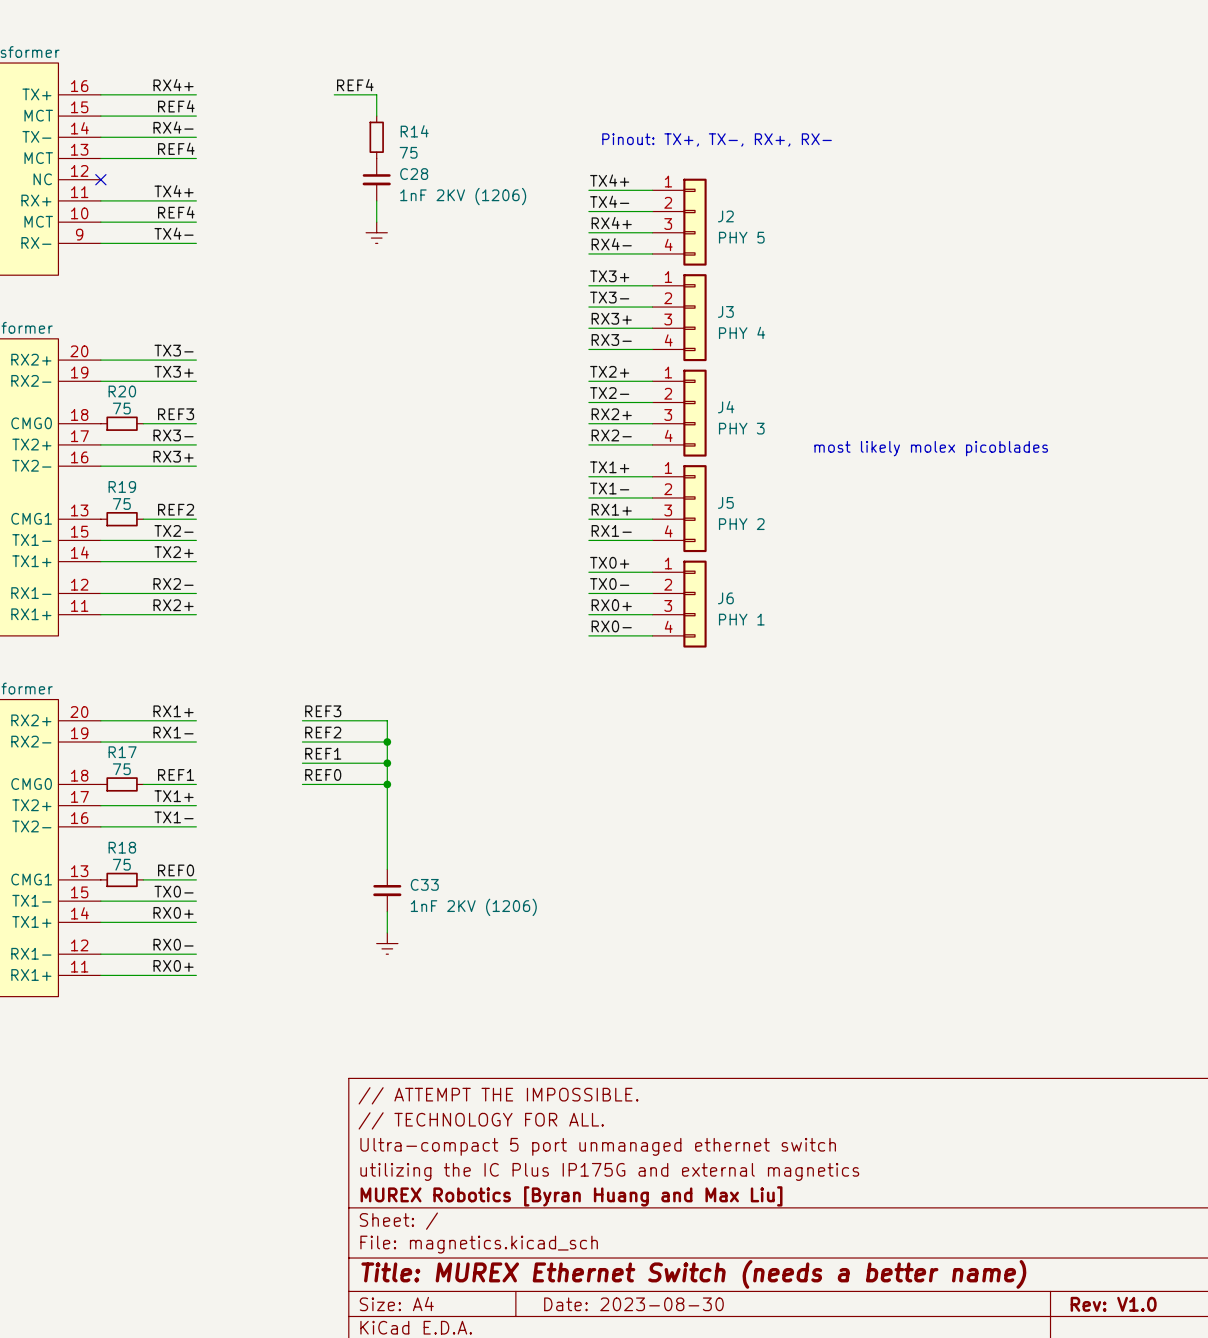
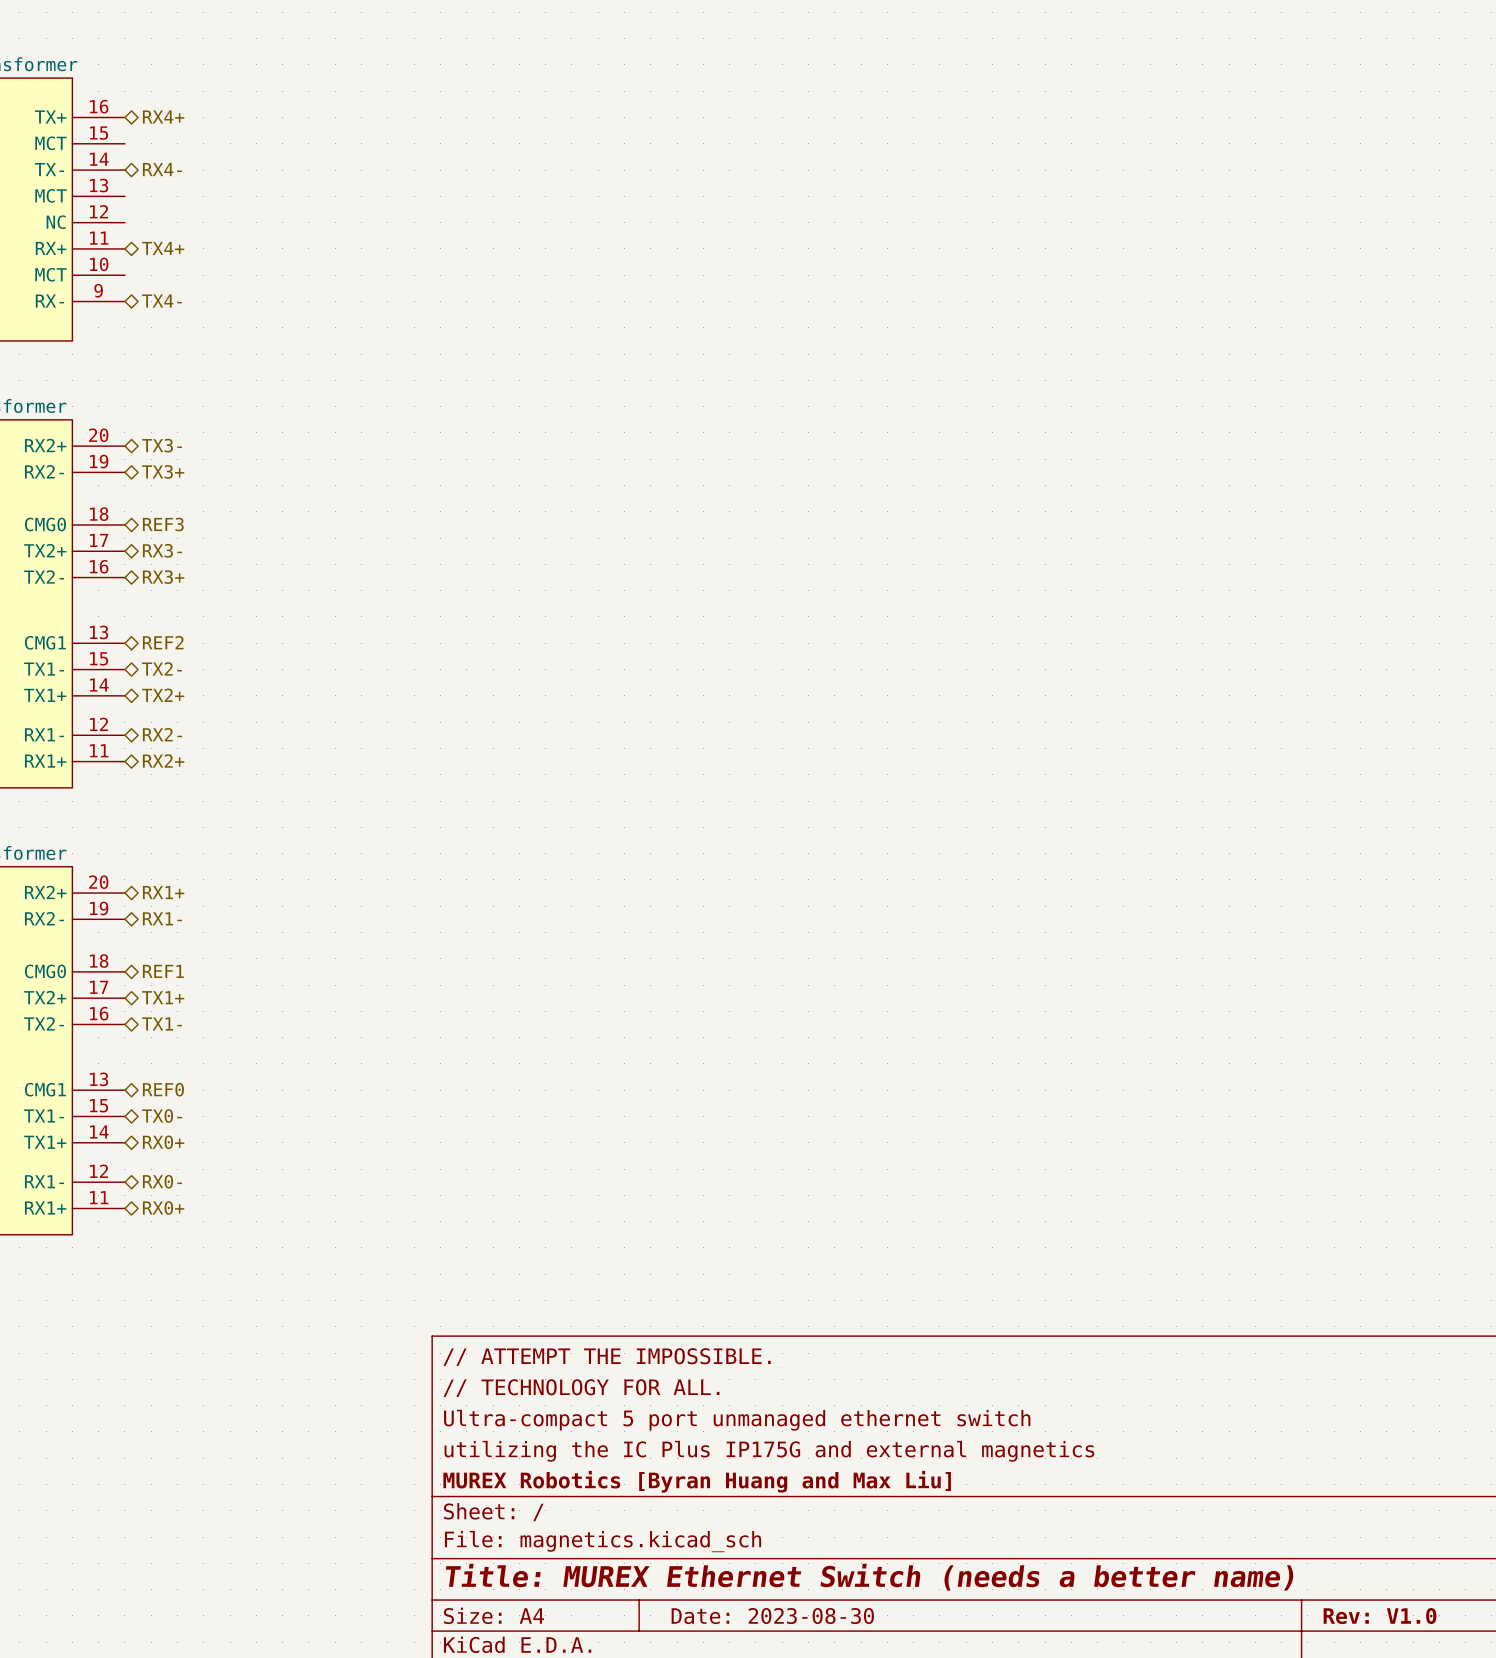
label: RX4+ (173, 85) -> none
label: REF4 (355, 85) -> none
wire: (100, 94) (196, 94) -> none
hierarchical label: none -> RX4+ (163, 117)
wire: (334, 94) (376, 94) (376, 116) -> none
label: REF4 (176, 106) -> none
wire: (100, 116) (196, 116) -> none
label: RX4- (173, 127) -> none
hierarchical label: none -> RX4- (162, 169)
wire: (100, 137) (196, 137) -> none
R14: 75 (376, 137) -> none
text: Pinout: TX+, TX-, RX+, RX- (717, 139) -> none
label: REF4 (176, 148) -> none
wire: (100, 158) (196, 158) -> none
no-connect mark: (100, 179) -> none
C28: 1nF 2KV (1206) (376, 179) -> none
label: TX4+ (609, 180) -> none
wire: (588, 190) (652, 190) -> none
label: TX4+ (174, 191) -> none
wire: (100, 200) (196, 200) -> none
hierarchical label: none -> TX4+ (163, 248)
wire: (376, 200) (376, 222) -> none
label: TX4- (609, 201) -> none
wire: (588, 211) (652, 211) -> none
label: REF4 (176, 212) -> none
wire: (100, 222) (196, 222) -> none
J2: PHY 5 (679, 222) -> none
label: RX4+ (611, 223) -> none
power symbol: (376, 232) -> none
wire: (588, 232) (652, 232) -> none
label: TX4- (174, 233) -> none
hierarchical label: none -> TX4- (162, 301)
wire: (100, 243) (196, 243) -> none
label: RX4- (611, 244) -> none
wire: (588, 253) (652, 253) -> none
label: TX3+ (609, 276) -> none
wire: (588, 285) (652, 285) -> none
label: TX3- (609, 297) -> none
wire: (588, 307) (652, 307) -> none
J3: PHY 4 (679, 317) -> none
label: RX3+ (611, 318) -> none
wire: (588, 328) (652, 328) -> none
label: RX3- (611, 339) -> none
wire: (588, 349) (652, 349) -> none
label: TX3- (174, 350) -> none
hierarchical label: none -> TX3- (162, 445)
wire: (100, 360) (196, 360) -> none
label: TX3+ (174, 371) -> none
label: TX2+ (609, 371) -> none
hierarchical label: none -> TX3+ (163, 471)
wire: (100, 381) (196, 381) -> none
wire: (588, 381) (652, 381) -> none
label: TX2- (609, 393) -> none
wire: (588, 402) (652, 402) -> none
J4: PHY 3 (679, 413) -> none
label: REF3 (176, 414) -> none
label: RX2+ (611, 414) -> none
R20: 75 (122, 423) -> none
hierarchical label: none -> REF3 (163, 524)
wire: (143, 423) (196, 423) -> none
wire: (588, 423) (652, 423) -> none
label: RX3- (173, 435) -> none
label: RX2- (611, 435) -> none
wire: (100, 444) (196, 444) -> none
hierarchical label: none -> RX3- (162, 550)
wire: (588, 444) (652, 444) -> none
text: most likely molex picoblades (931, 448) -> none
label: RX3+ (173, 456) -> none
hierarchical label: none -> RX3+ (163, 577)
wire: (100, 466) (196, 466) -> none
label: TX1+ (609, 467) -> none
wire: (588, 476) (652, 476) -> none
label: TX1- (609, 488) -> none
wire: (588, 497) (652, 497) -> none
J5: PHY 2 (679, 508) -> none
label: REF2 (176, 509) -> none
label: RX1+ (611, 509) -> none
hierarchical label: none -> REF2 (163, 642)
R19: 75 (122, 519) -> none
wire: (143, 519) (196, 519) -> none
wire: (588, 519) (652, 519) -> none
label: TX2- (174, 530) -> none
label: RX1- (611, 530) -> none
wire: (100, 540) (196, 540) -> none
hierarchical label: none -> TX2- (162, 668)
wire: (588, 540) (652, 540) -> none
label: TX2+ (174, 552) -> none
wire: (100, 561) (196, 561) -> none
hierarchical label: none -> TX2+ (163, 695)
label: TX0+ (609, 562) -> none
wire: (588, 572) (652, 572) -> none
label: RX2- (173, 584) -> none
label: TX0- (609, 584) -> none
wire: (100, 593) (196, 593) -> none
hierarchical label: none -> RX2- (162, 734)
wire: (588, 593) (652, 593) -> none
J6: PHY 1 (679, 604) -> none
label: RX2+ (173, 605) -> none
label: RX0+ (611, 605) -> none
wire: (100, 614) (196, 614) -> none
hierarchical label: none -> RX2+ (163, 760)
wire: (588, 614) (652, 614) -> none
label: RX0- (611, 626) -> none
wire: (588, 635) (652, 635) -> none
label: RX1+ (173, 711) -> none
label: REF3 (323, 711) -> none
wire: (100, 720) (196, 720) -> none
hierarchical label: none -> RX1+ (163, 892)
wire: (302, 720) (387, 720) (387, 869) -> none
label: RX1- (173, 732) -> none
label: REF2 (323, 732) -> none
hierarchical label: none -> RX1- (162, 918)
wire: (100, 742) (196, 742) -> none
wire: (302, 742) (387, 742) -> none
junction: (387, 742) -> none
label: REF1 (323, 753) -> none
wire: (302, 763) (387, 763) -> none
junction: (387, 763) -> none
label: REF1 (176, 774) -> none
label: REF0 (323, 774) -> none
R17: 75 (122, 784) -> none
hierarchical label: none -> REF1 (163, 971)
wire: (143, 784) (196, 784) -> none
wire: (302, 784) (387, 784) -> none
junction: (387, 784) -> none
label: TX1+ (174, 796) -> none
wire: (100, 805) (196, 805) -> none
hierarchical label: none -> TX1+ (163, 997)
label: TX1- (174, 817) -> none
wire: (100, 826) (196, 826) -> none
hierarchical label: none -> TX1- (162, 1023)
label: REF0 (176, 870) -> none
R18: 75 (122, 879) -> none
hierarchical label: none -> REF0 (163, 1089)
wire: (143, 879) (196, 879) -> none
C33: 1nF 2KV (1206) (387, 890) -> none
label: TX0- (174, 891) -> none
hierarchical label: none -> TX0- (162, 1116)
wire: (100, 901) (196, 901) -> none
wire: (387, 911) (387, 932) -> none
label: RX0+ (173, 912) -> none
hierarchical label: none -> RX0+ (163, 1142)
wire: (100, 922) (196, 922) -> none
power symbol: (387, 943) -> none
label: RX0- (173, 944) -> none
hierarchical label: none -> RX0- (162, 1181)
wire: (100, 954) (196, 954) -> none
label: RX0+ (173, 965) -> none
wire: (100, 975) (196, 975) -> none
hierarchical label: none -> RX0+ (163, 1208)

